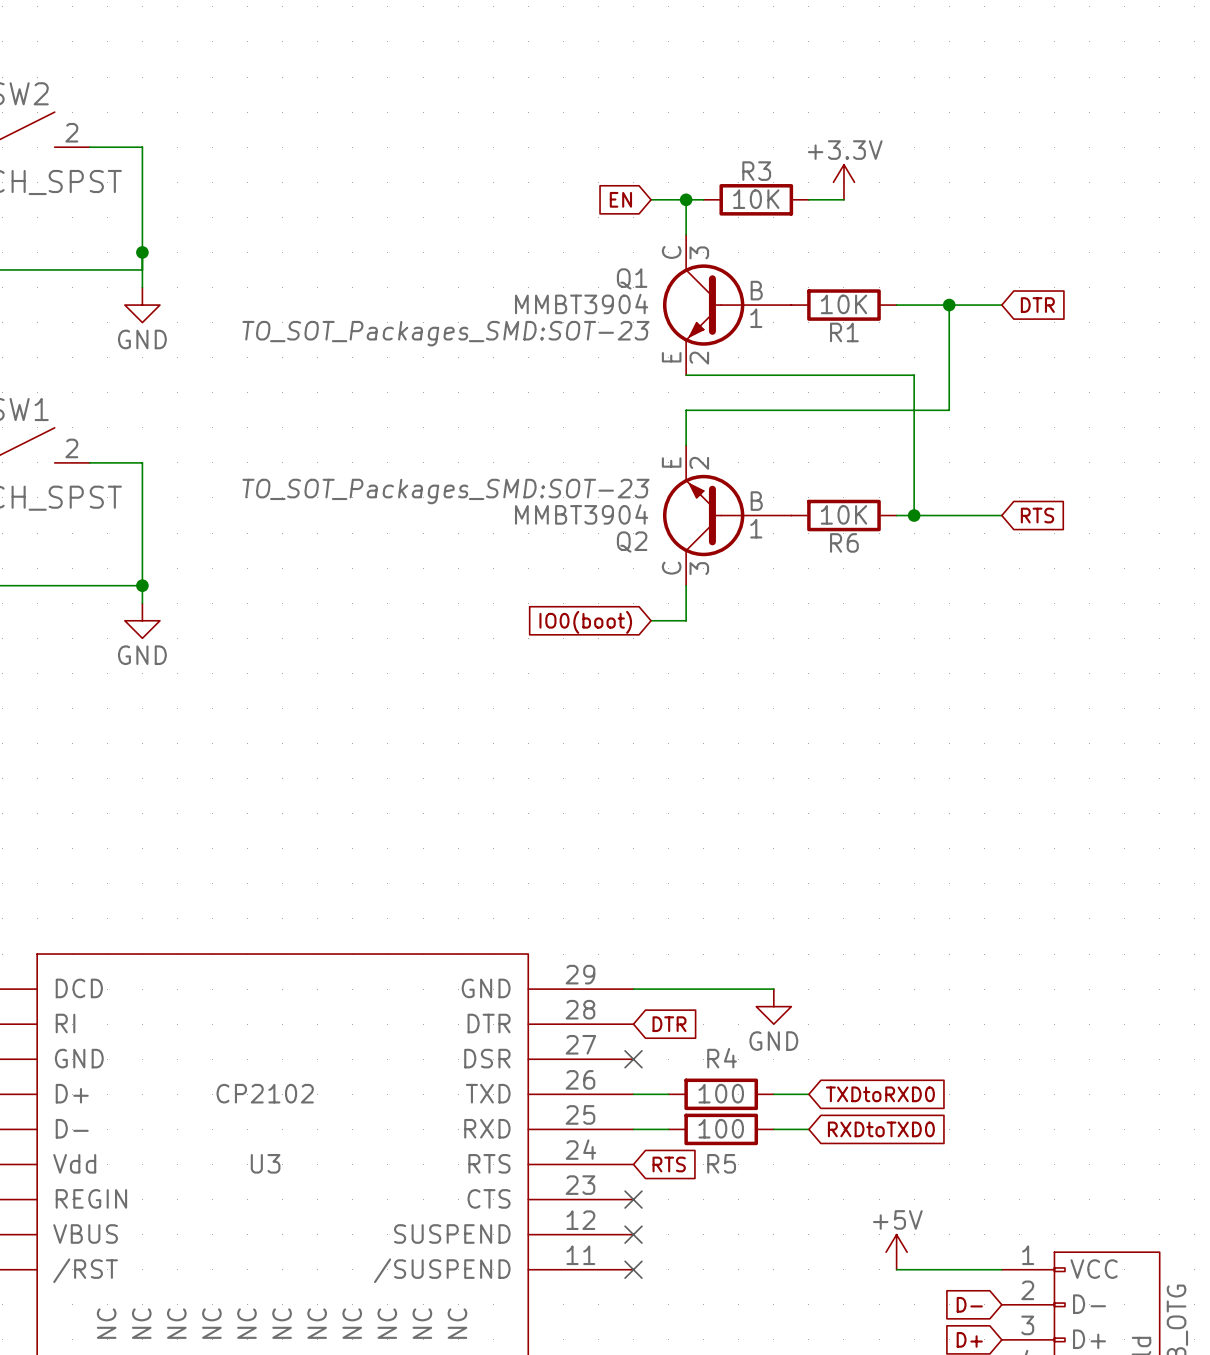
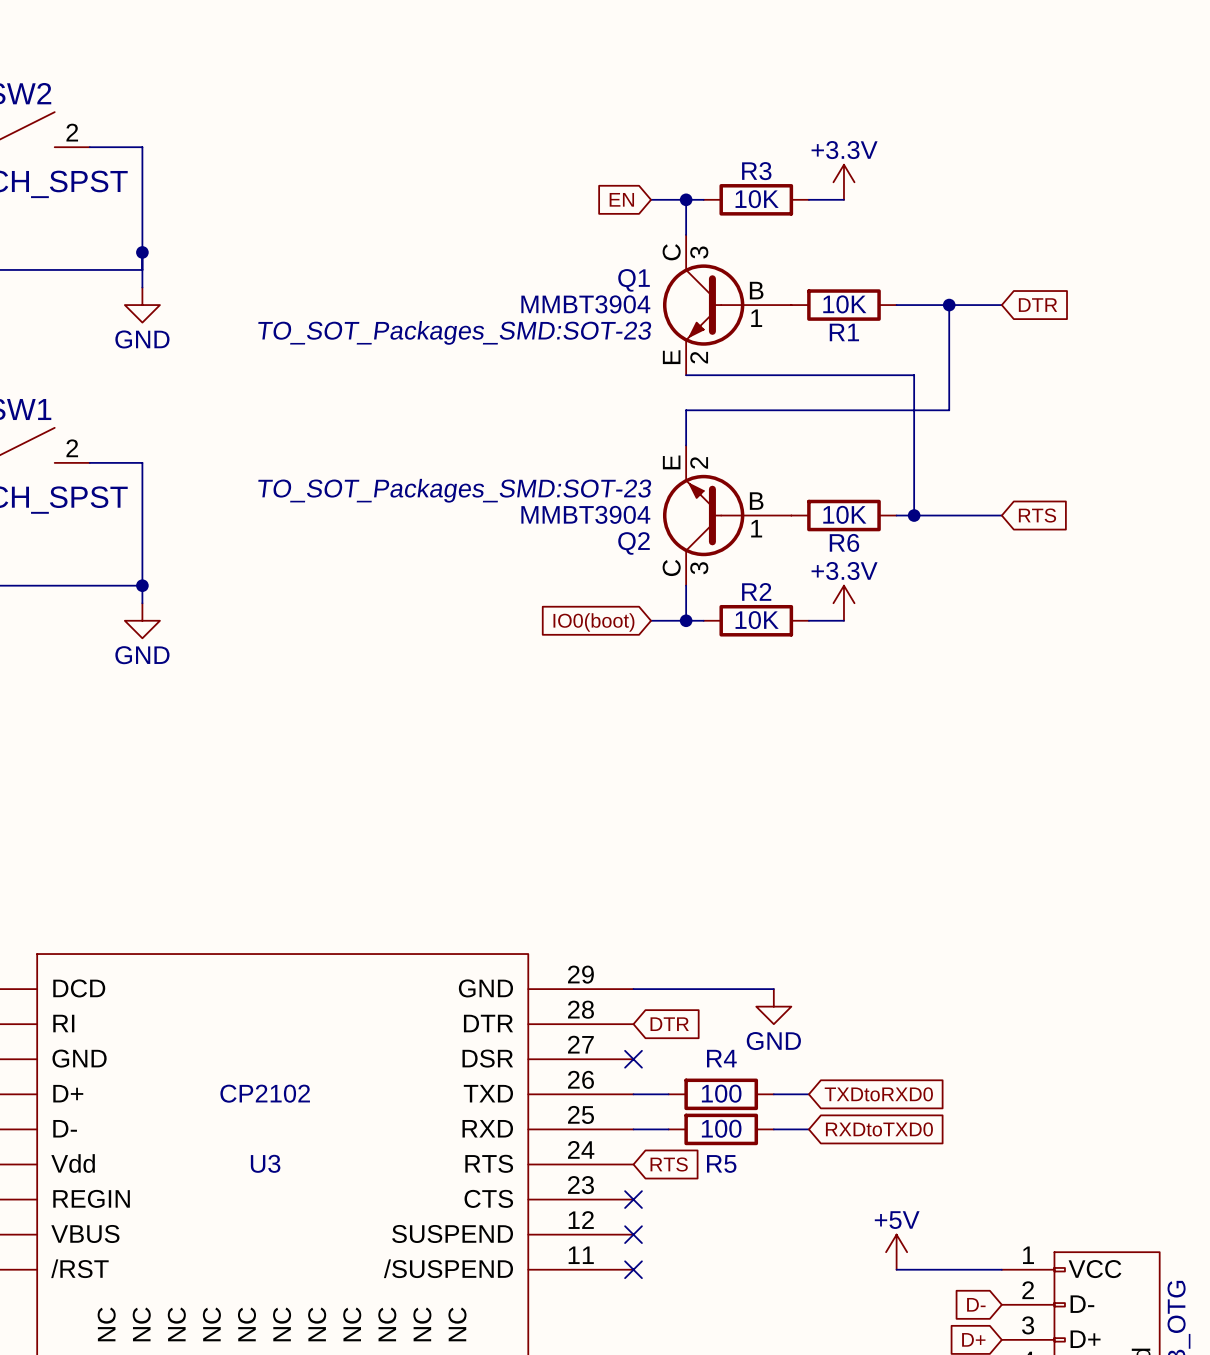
power symbol: none -> +3.3V (843, 603)
wire: none -> (686, 620) (703, 620)
junction: none -> (686, 620)
R2: none -> 10K (756, 620)
wire: none -> (808, 620) (843, 620)

